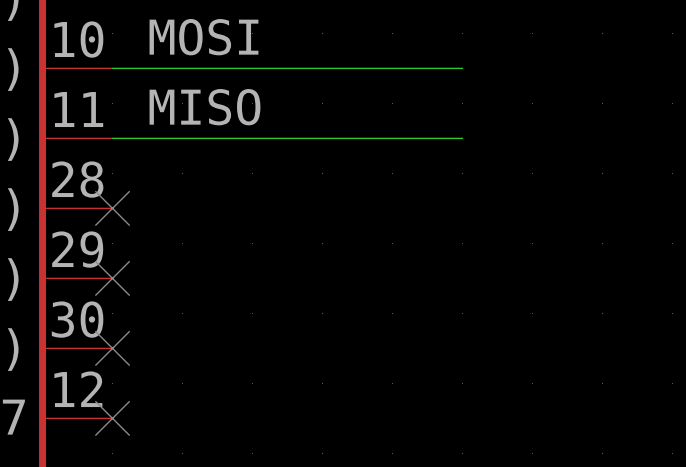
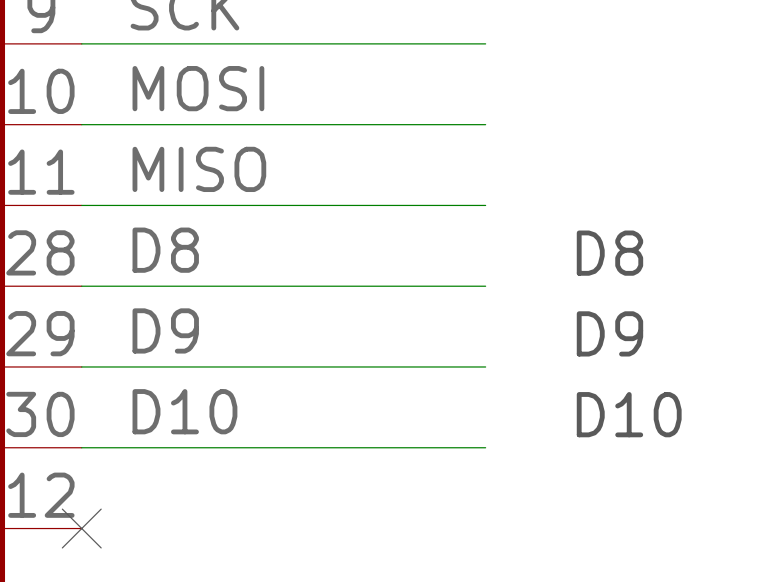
label: none -> D8 (165, 250)
text: none -> D8 (609, 253)
wire: none -> (81, 286) (485, 286)
no-connect mark: (112, 208) -> none
label: none -> D9 (165, 330)
text: none -> D9 (609, 333)
wire: none -> (81, 366) (485, 366)
no-connect mark: (112, 278) -> none
label: none -> D10 (184, 411)
text: none -> D10 (629, 414)
wire: none -> (81, 447) (485, 447)
no-connect mark: (112, 348) -> none

